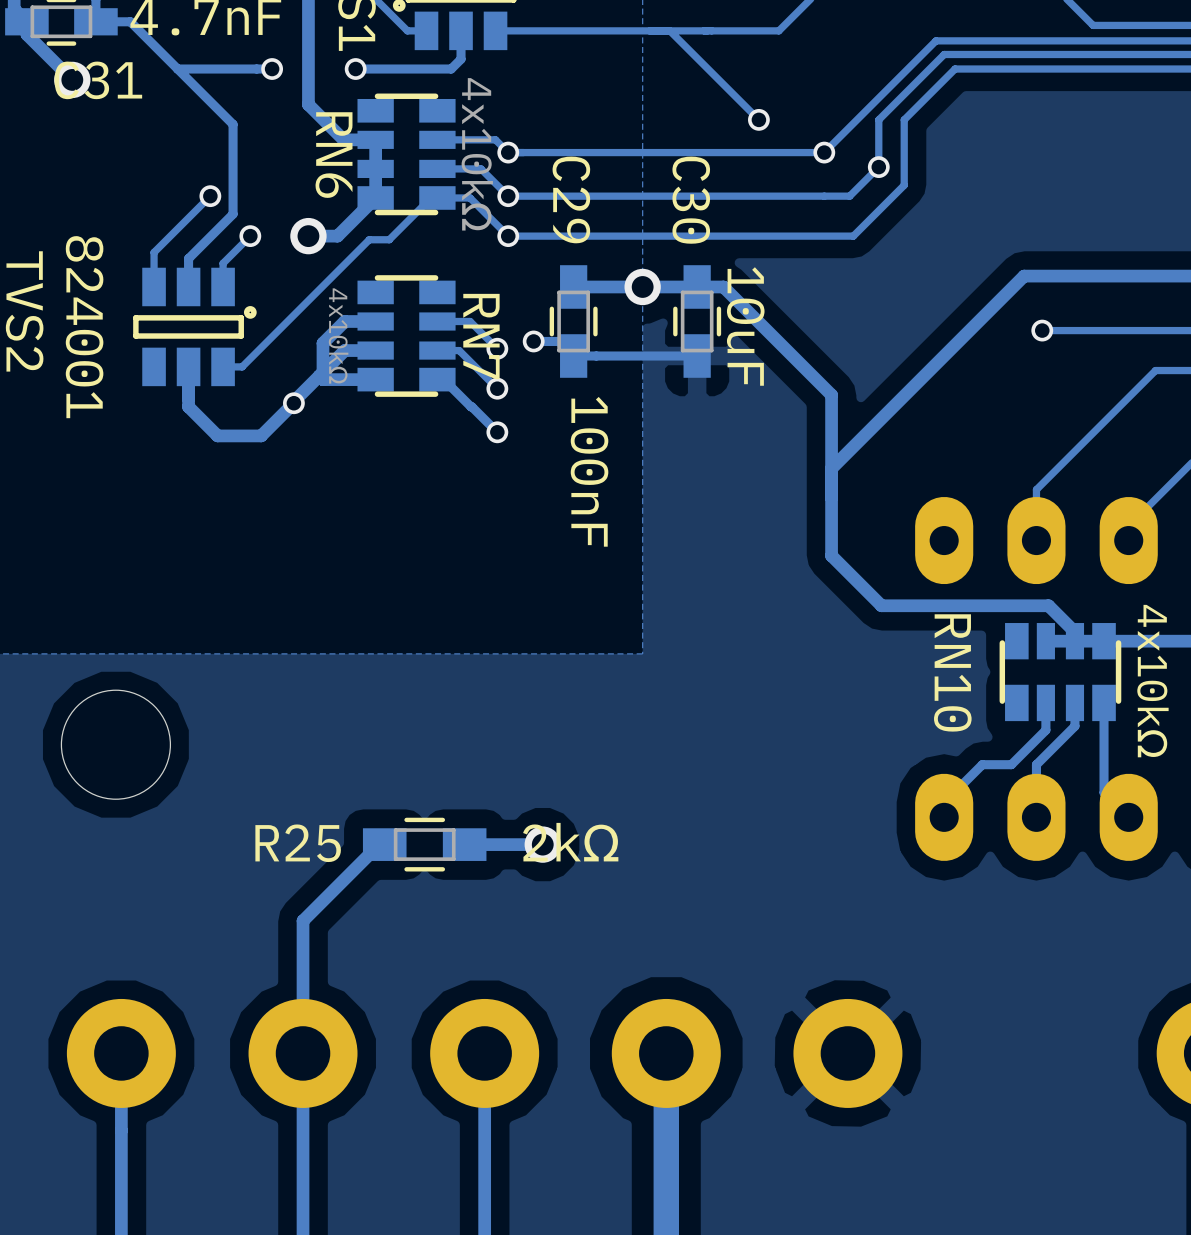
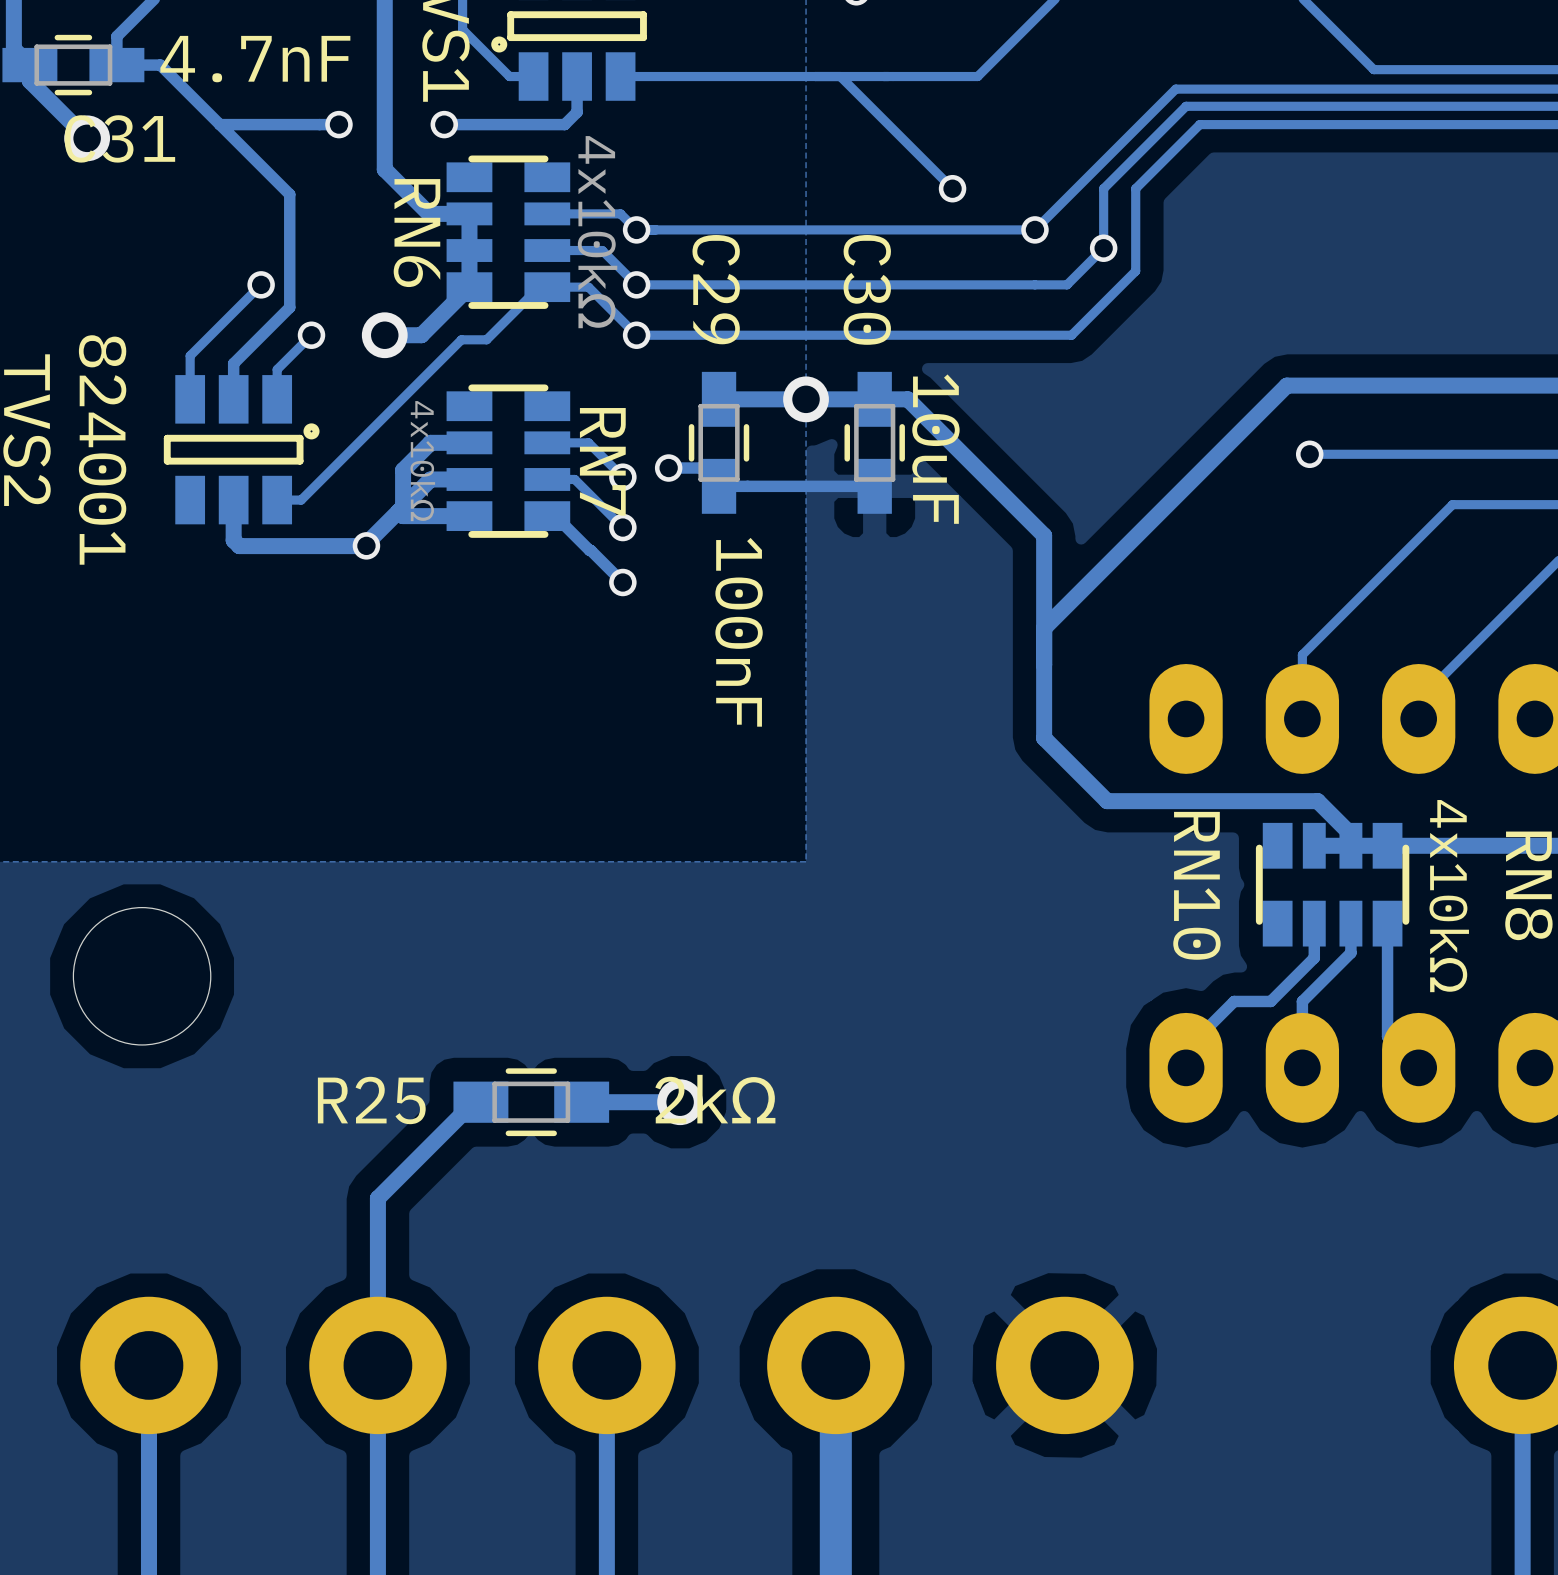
track: (188, 398) (188, 406) (217, 435) (261, 435) (293, 403) -> (233, 540) (239, 546) (363, 546)

